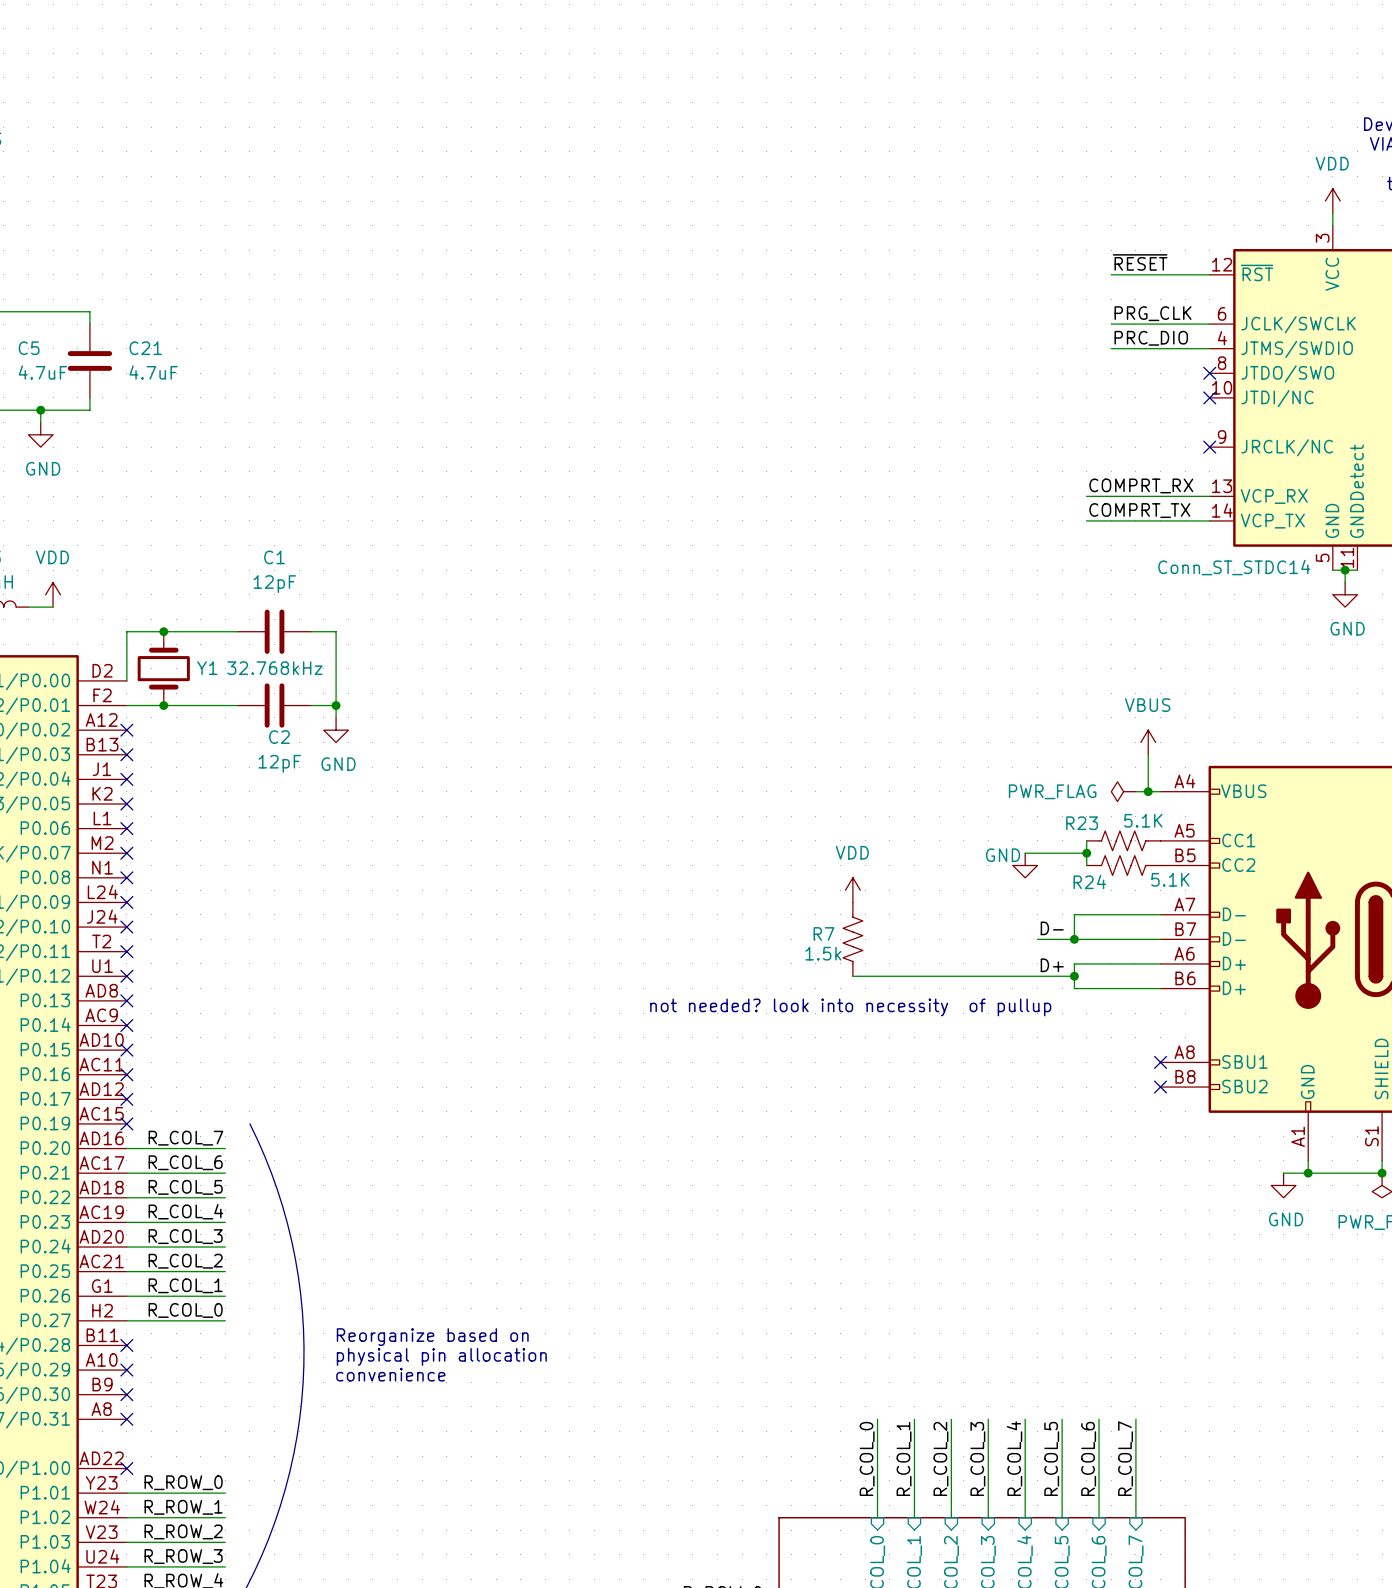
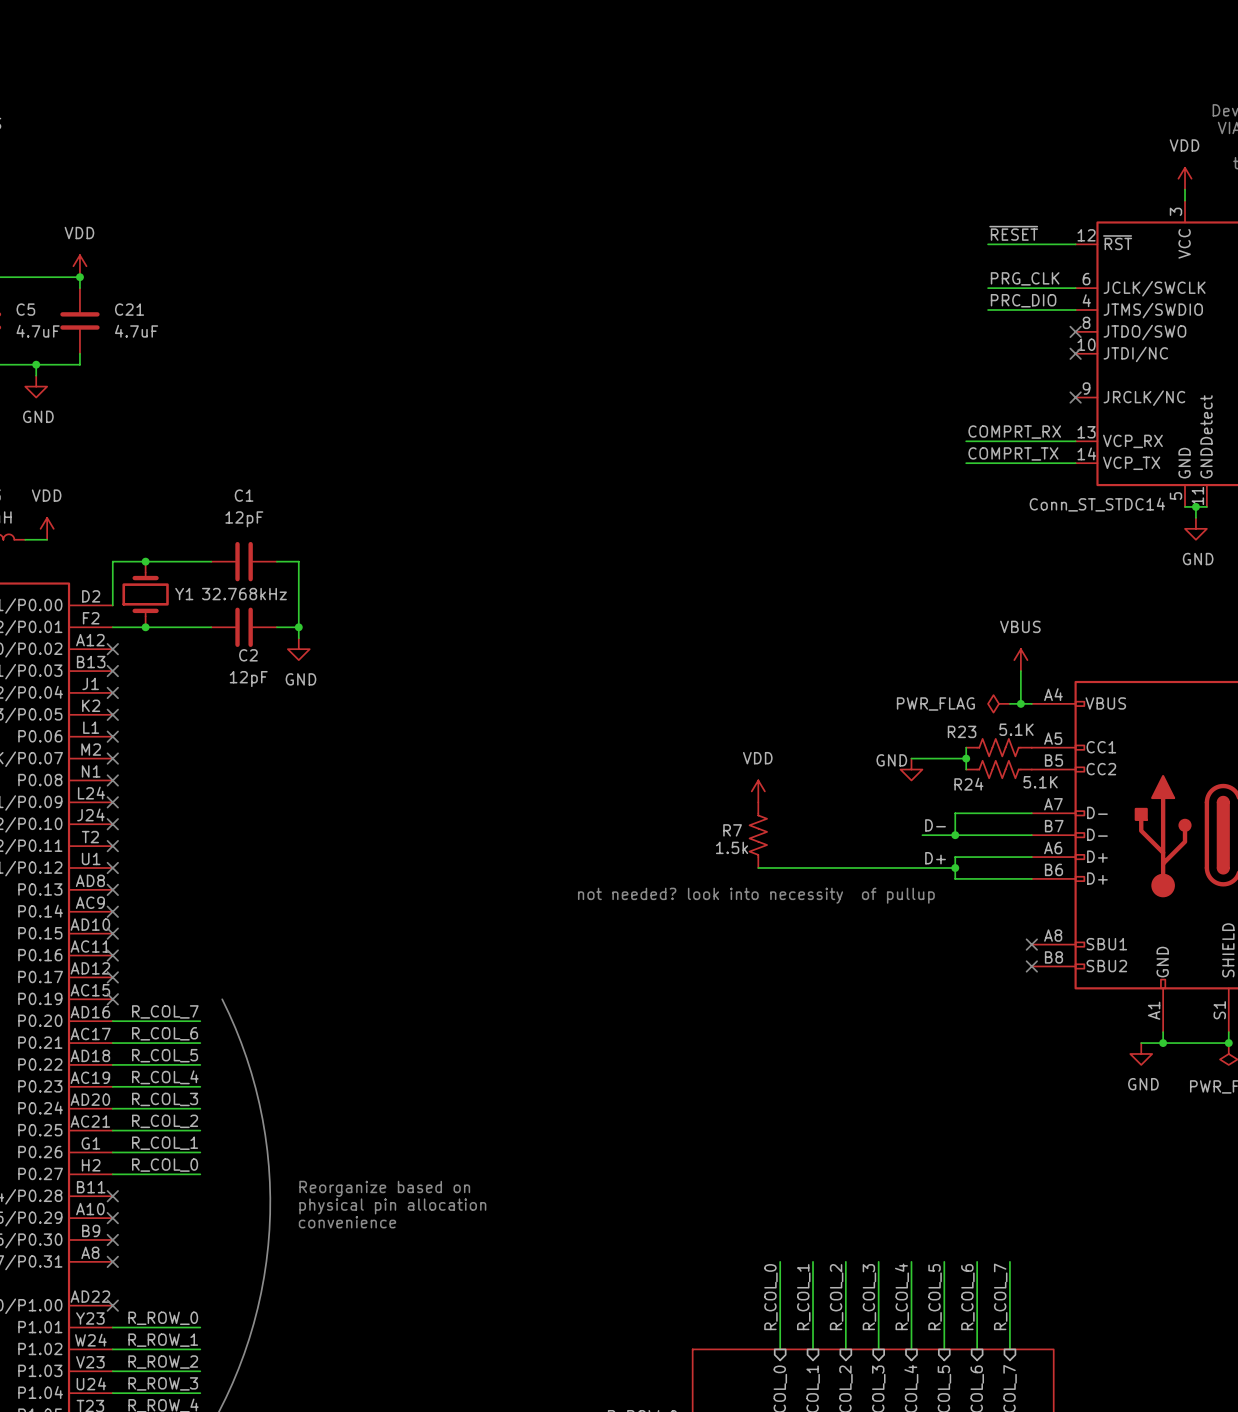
power symbol: none -> VDD (79, 266)
junction: none -> (79, 277)

